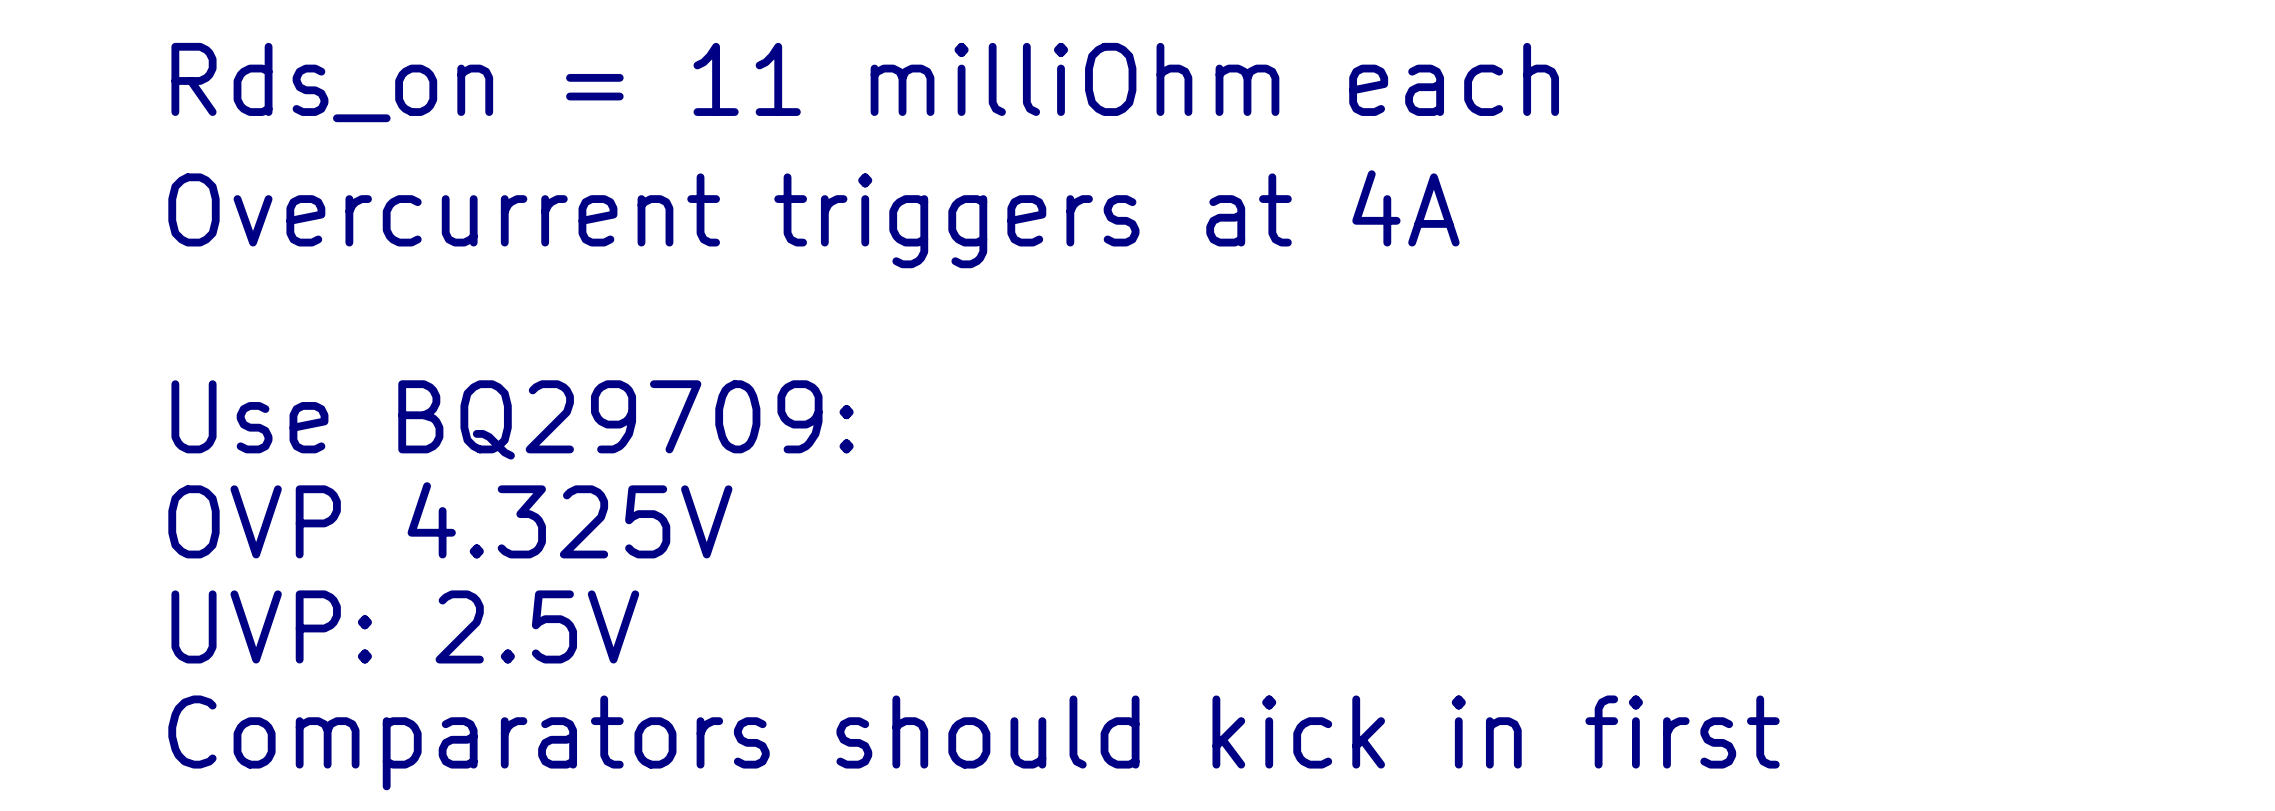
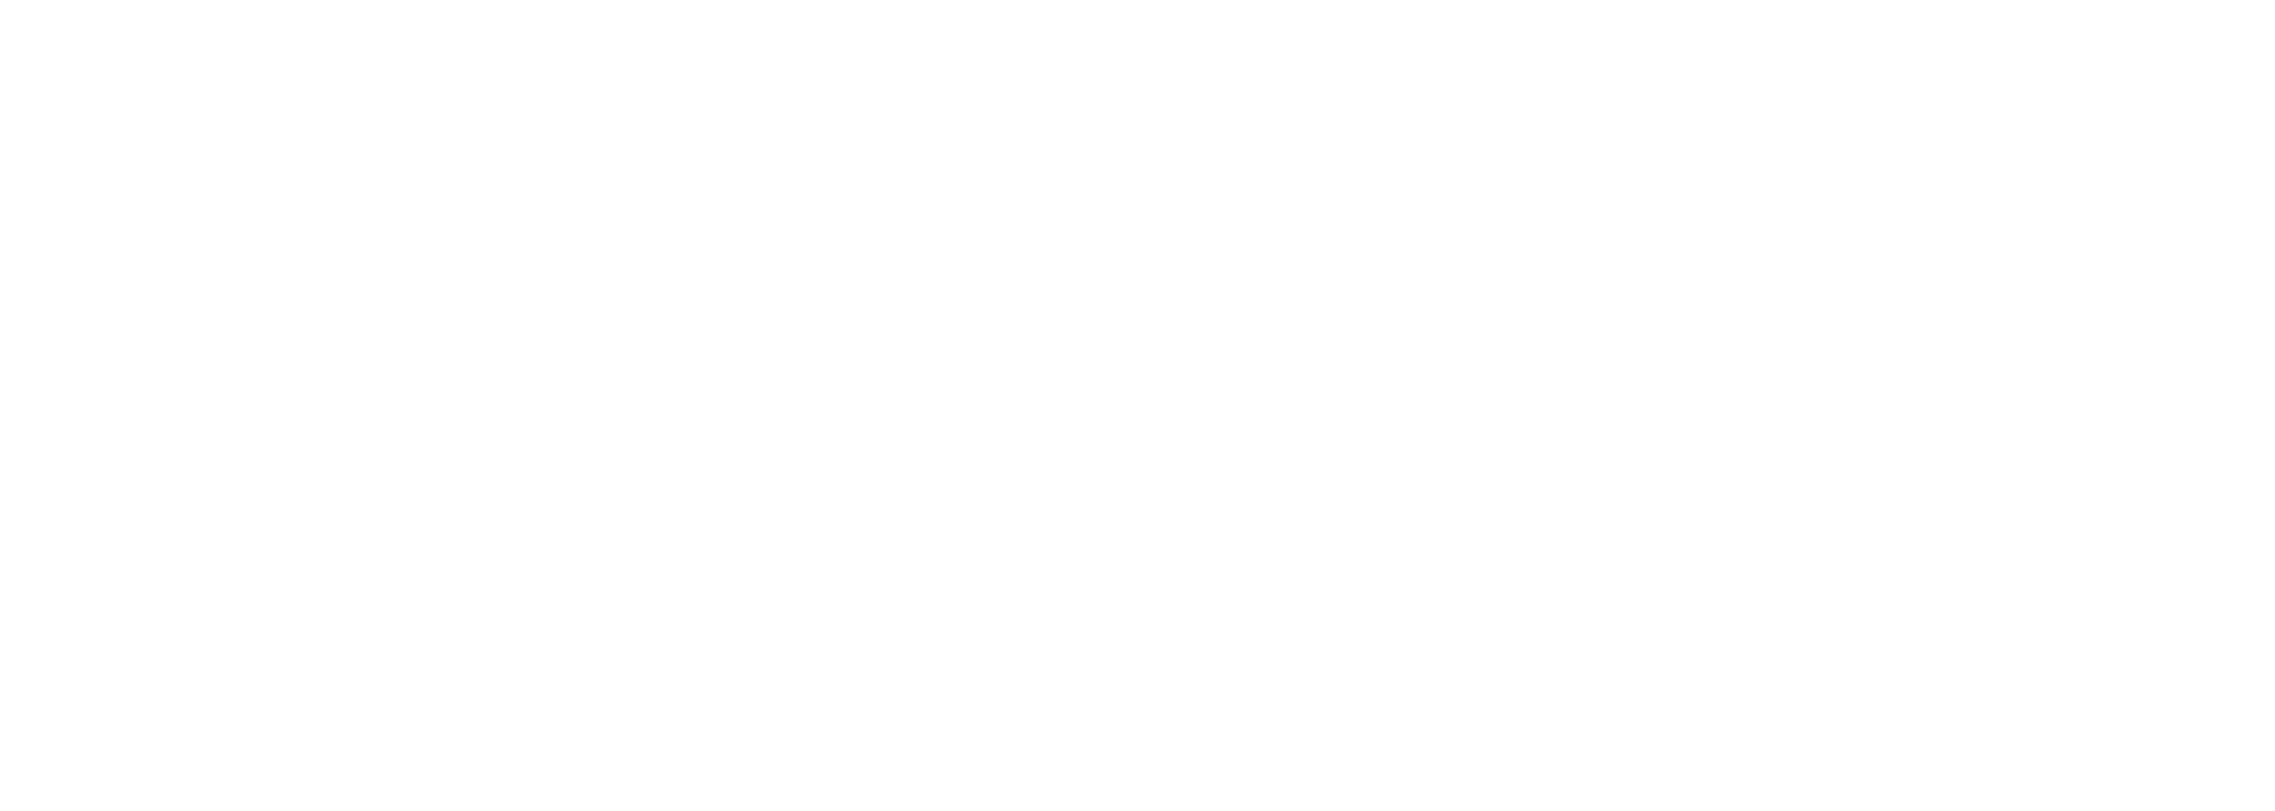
text: Rds_on = 11 milliOhm each (865, 82) -> none
text: Overcurrent triggers at 4A (813, 219) -> none
text: Use BQ29709: (512, 419) -> none
text: OVP 4.325V (450, 520) -> none
text: UVP: 2.5V (405, 626) -> none
text: Comparators should kick in first (973, 742) -> none

